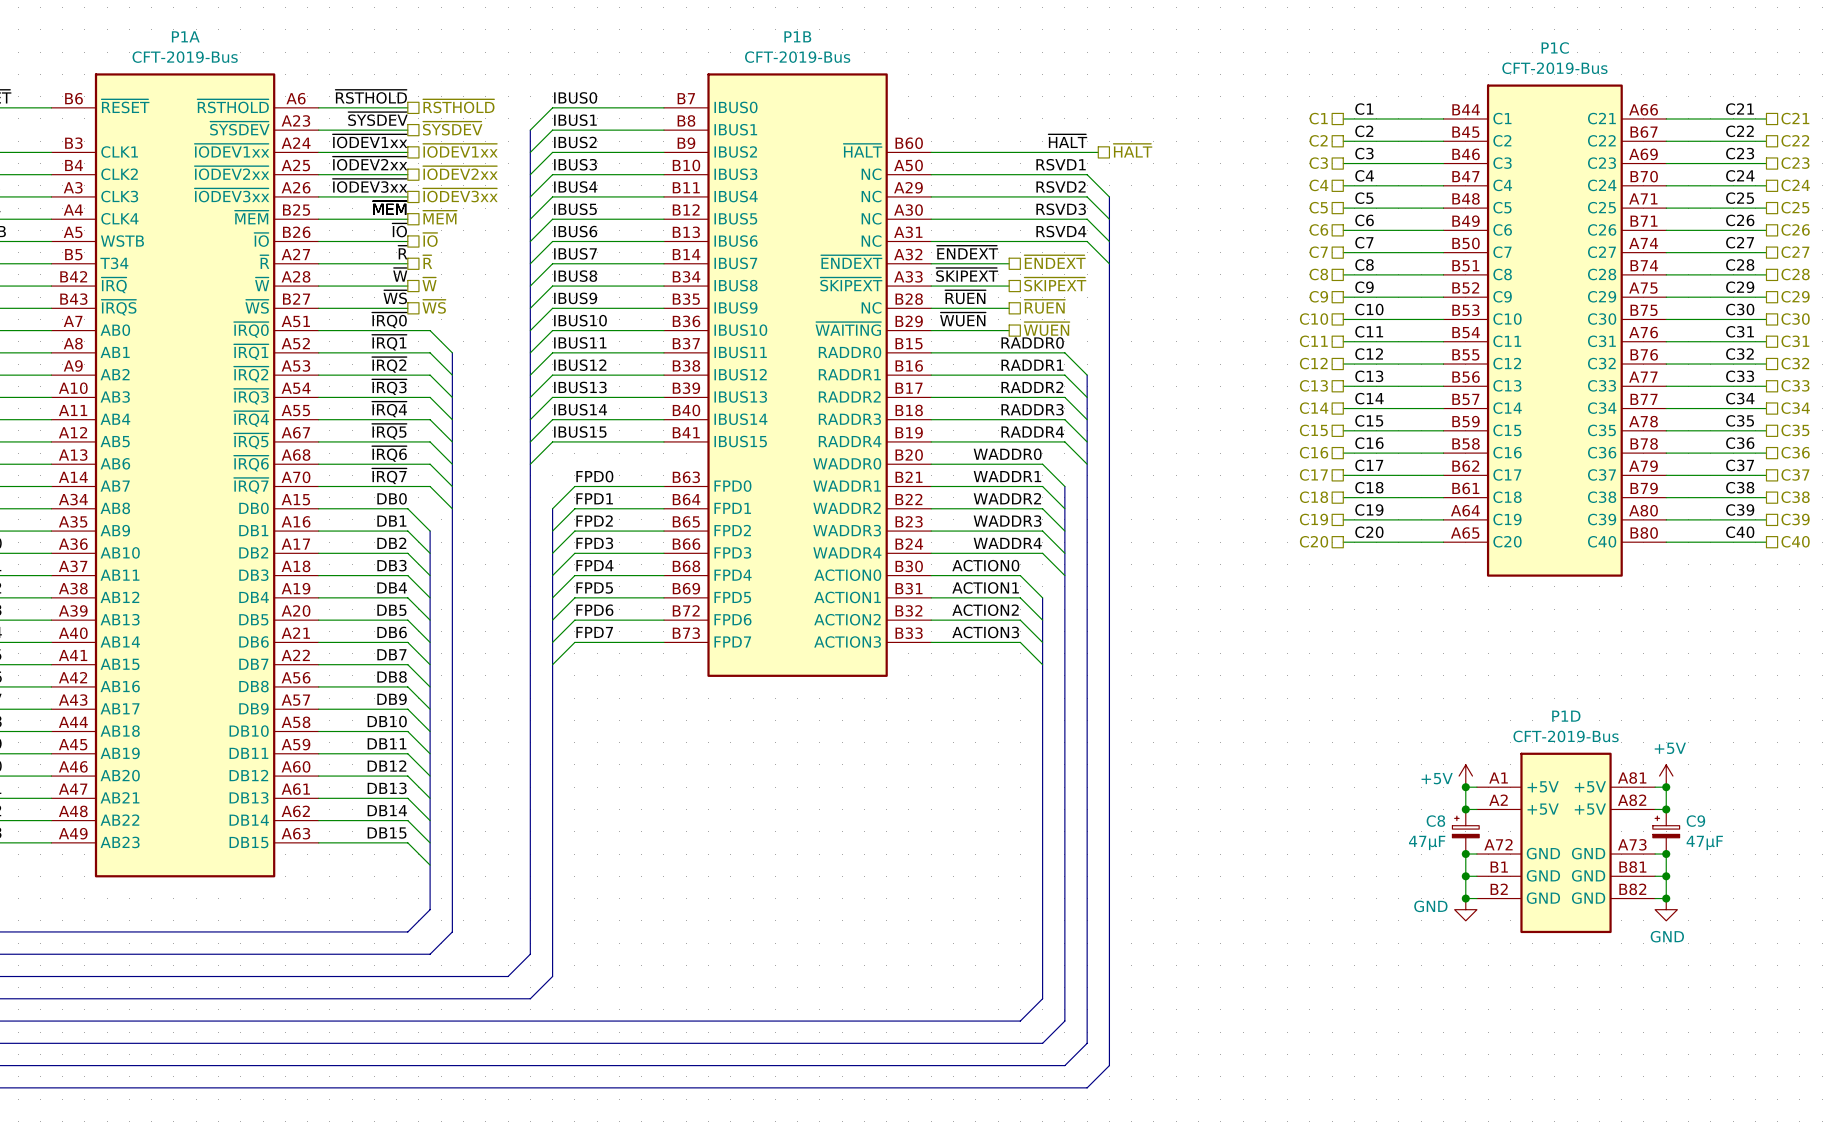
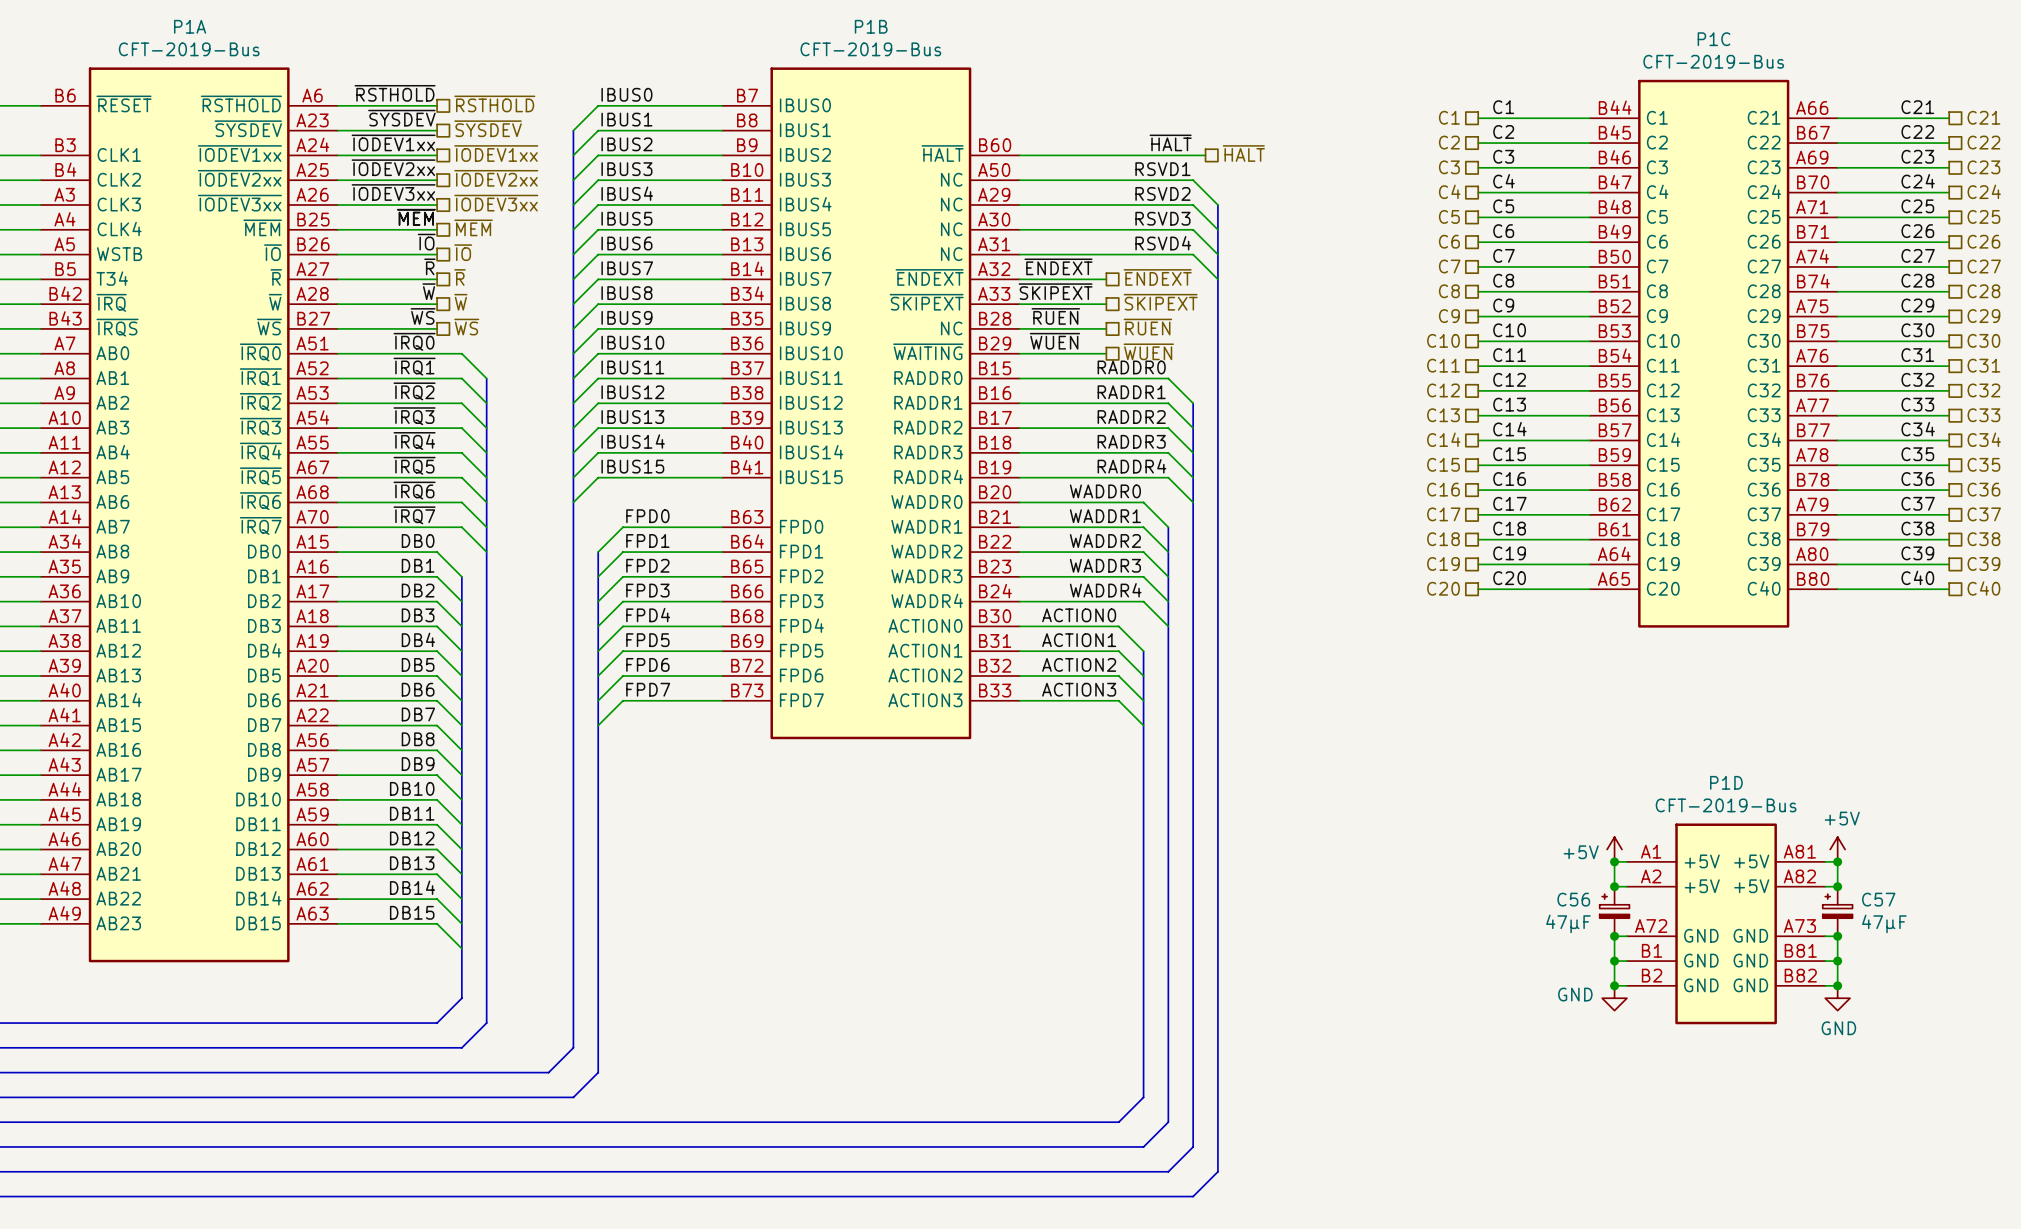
C8 name: C8 (1435, 821) -> C56 (1573, 899)
C9 name: C9 (1695, 821) -> C57 (1878, 899)

